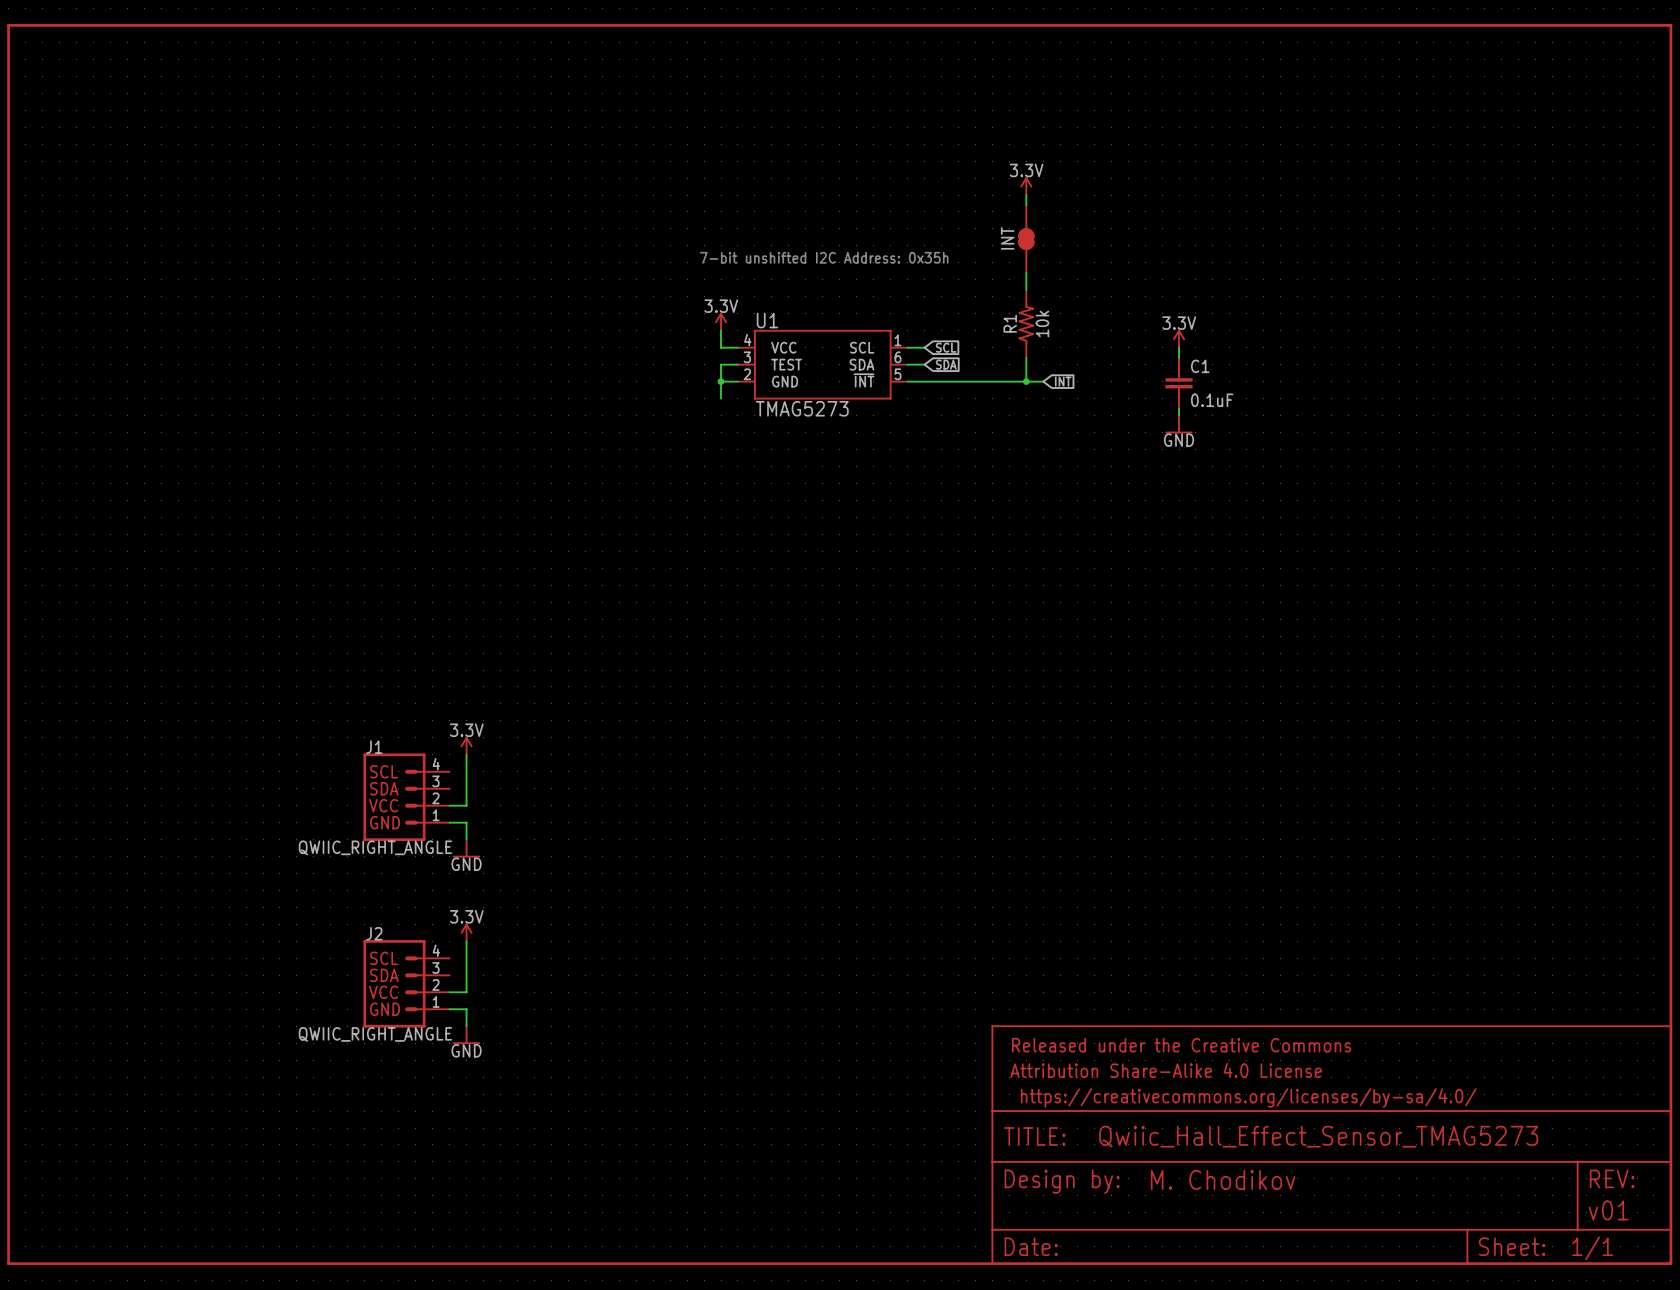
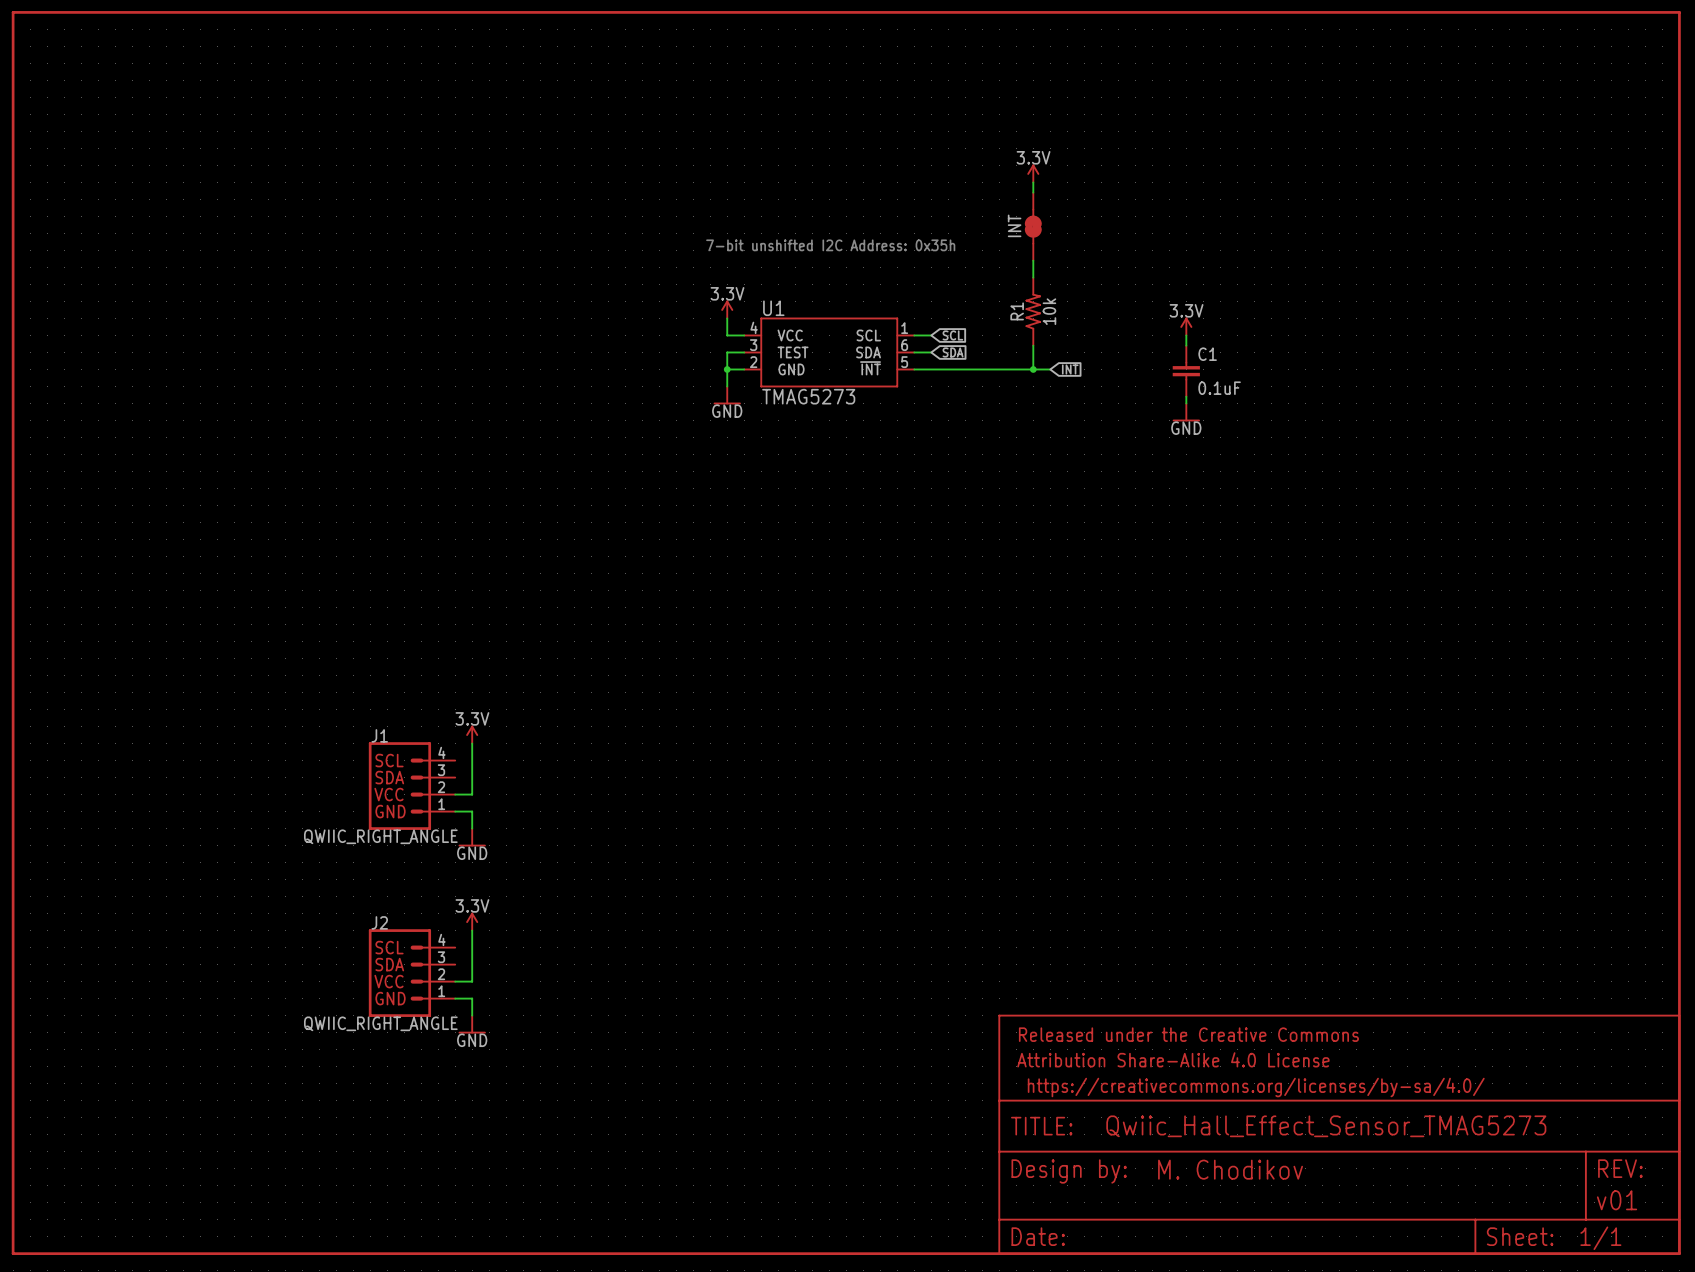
power symbol: none -> GND (727, 395)

